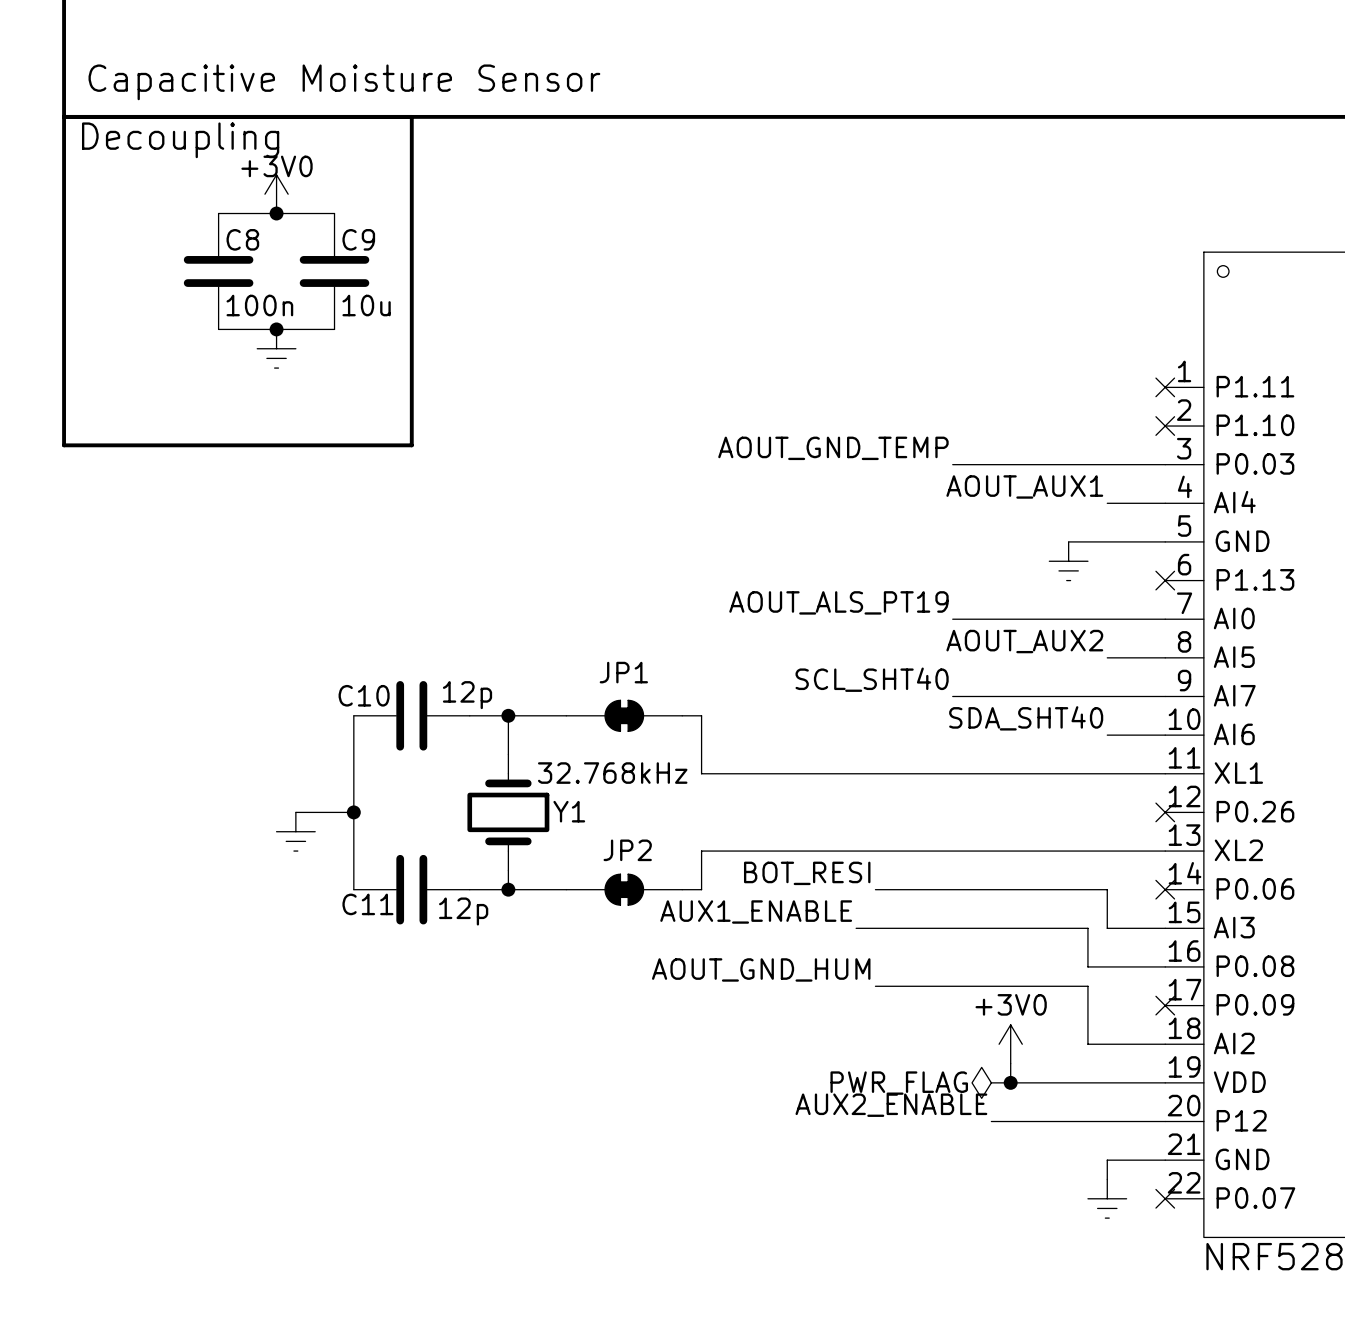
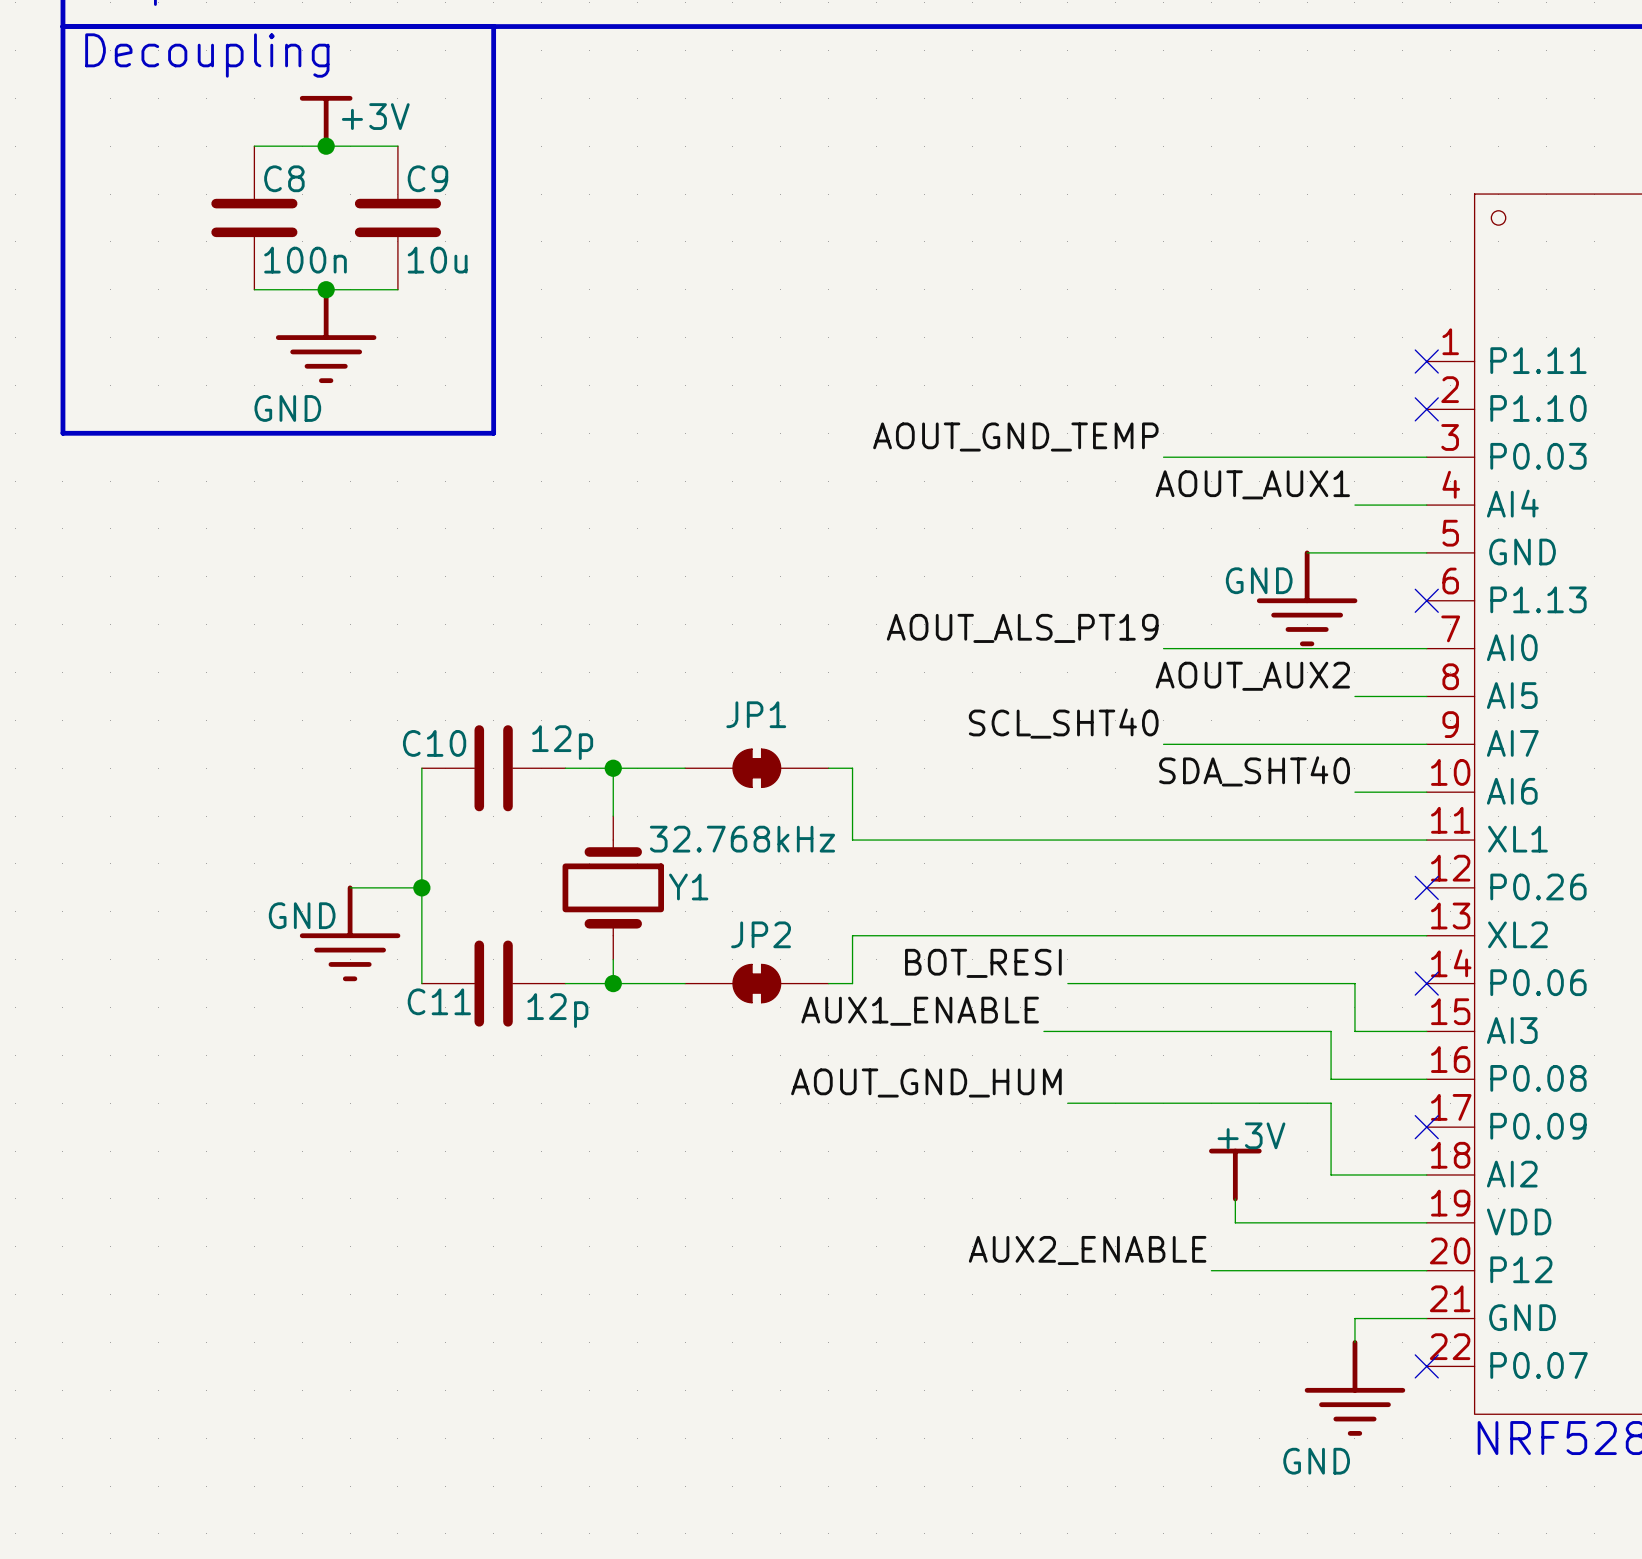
power symbol: +3V0 (276, 194) -> +3V (326, 122)
power symbol: (276, 348) -> none
power symbol: none -> GND (326, 335)
power symbol: (1068, 561) -> none
power symbol: none -> GND (1307, 598)
power symbol: (295, 831) -> none
power symbol: none -> GND (350, 933)
power symbol: +3V0 (1010, 1044) -> +3V (1235, 1174)
power symbol: PWR_FLAG (991, 1082) -> none
junction: (1010, 1082) -> none
power symbol: (1107, 1198) -> none
power symbol: none -> GND (1354, 1387)

